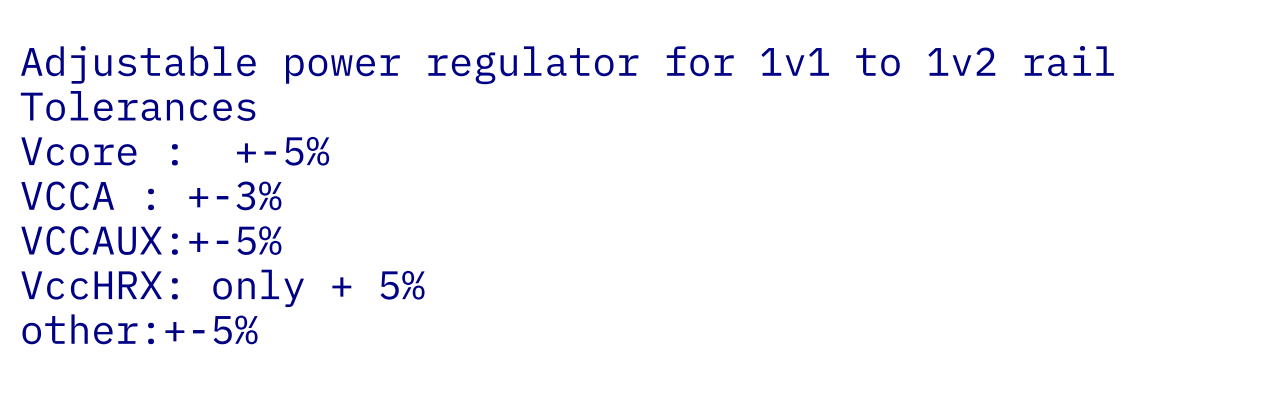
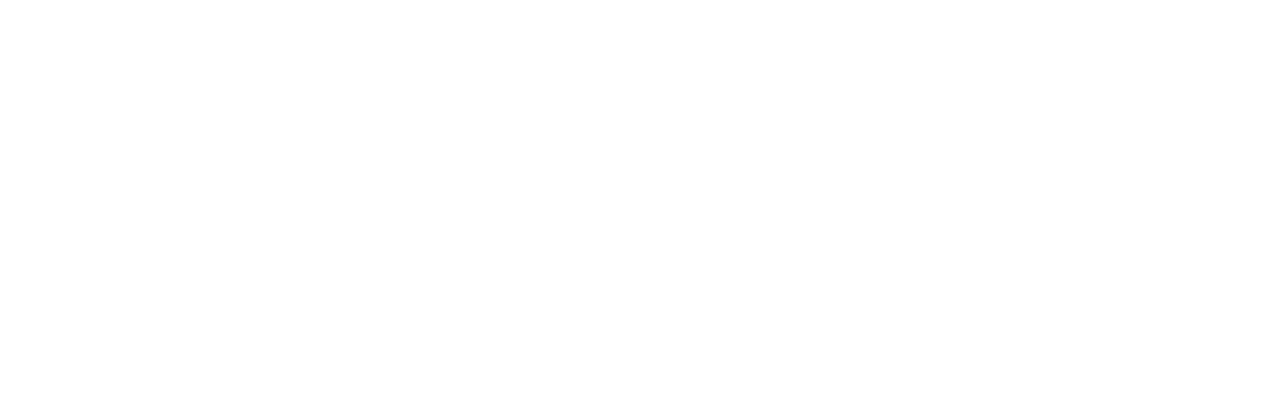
text: Adjustable power regulator for 1v1 to 1v2 rail (567, 65) -> none
text: Tolerances (138, 105) -> none
text: Vcore : +-5% (175, 151) -> none
text: VCCA : +-3% (151, 195) -> none
text: VCCAUX:+-5% (151, 240) -> none
text: VccHRX: only + 5% (222, 288) -> none
text: other:+-5% (140, 329) -> none

